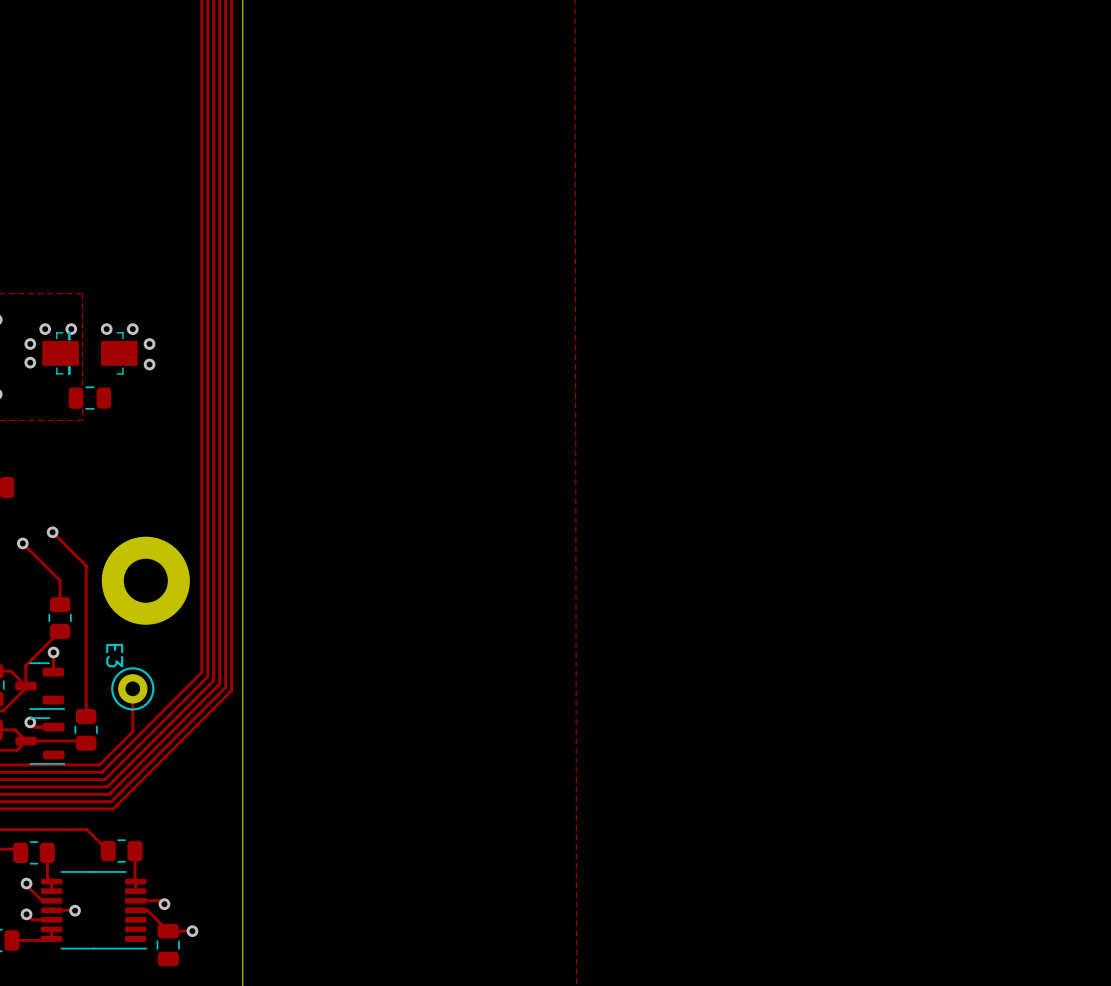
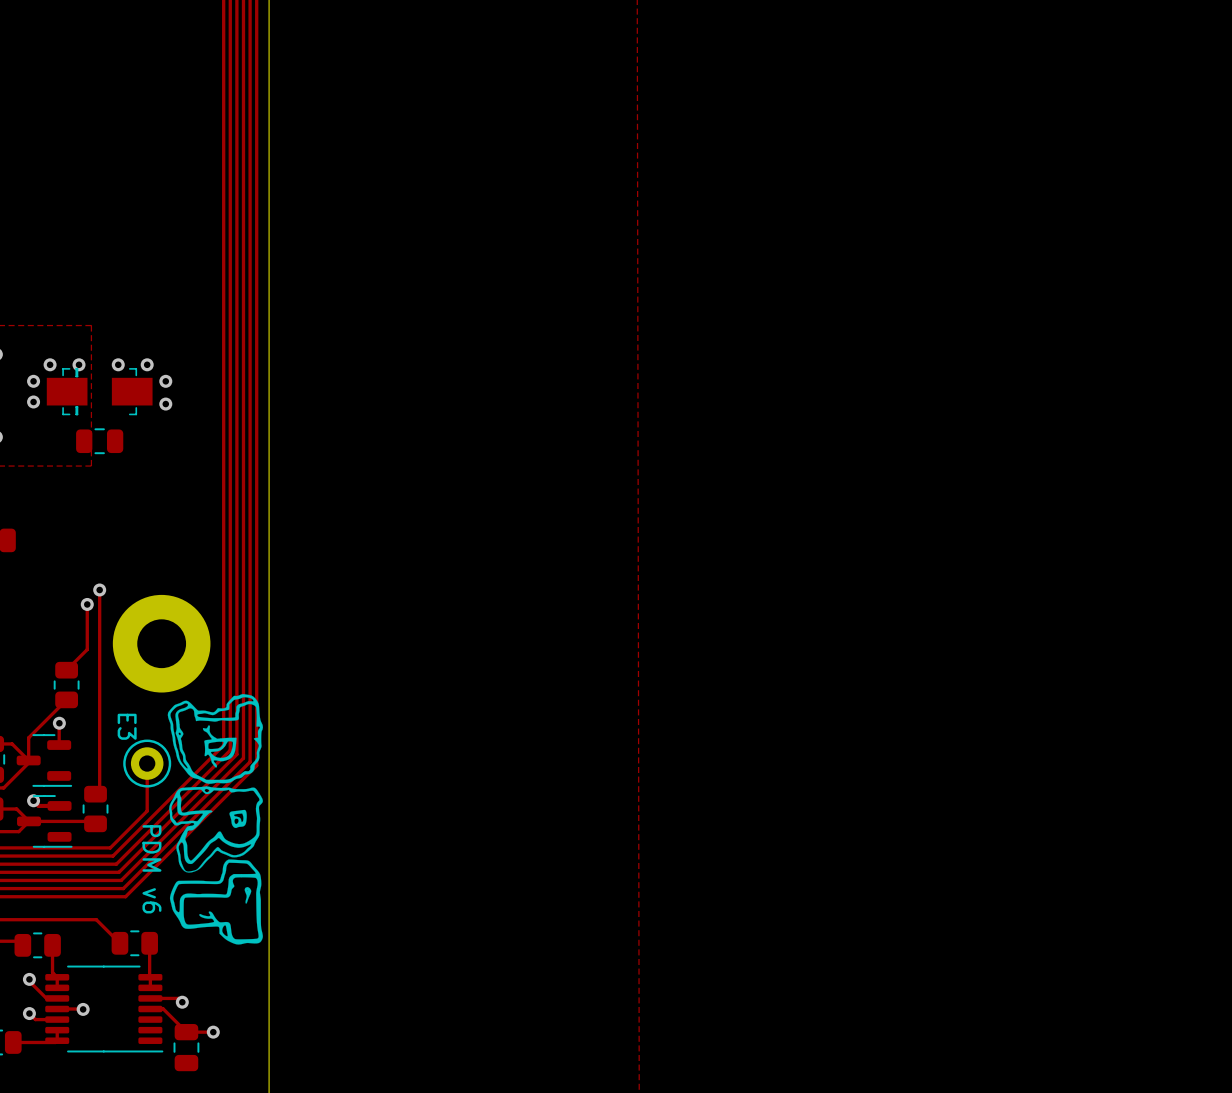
track: (52, 532) (86, 565) (86, 716) -> (99, 590) (99, 790) (95, 794)
via: (52, 532) -> none
via: none -> (99, 590)
track: (22, 543) (60, 580) (60, 604) -> (87, 604) (87, 649) (66, 670)
via: (22, 543) -> none
via: none -> (87, 604)
drawing: none -> [167, 694, 264, 945]
text: none -> PDM v6 (151, 869)

